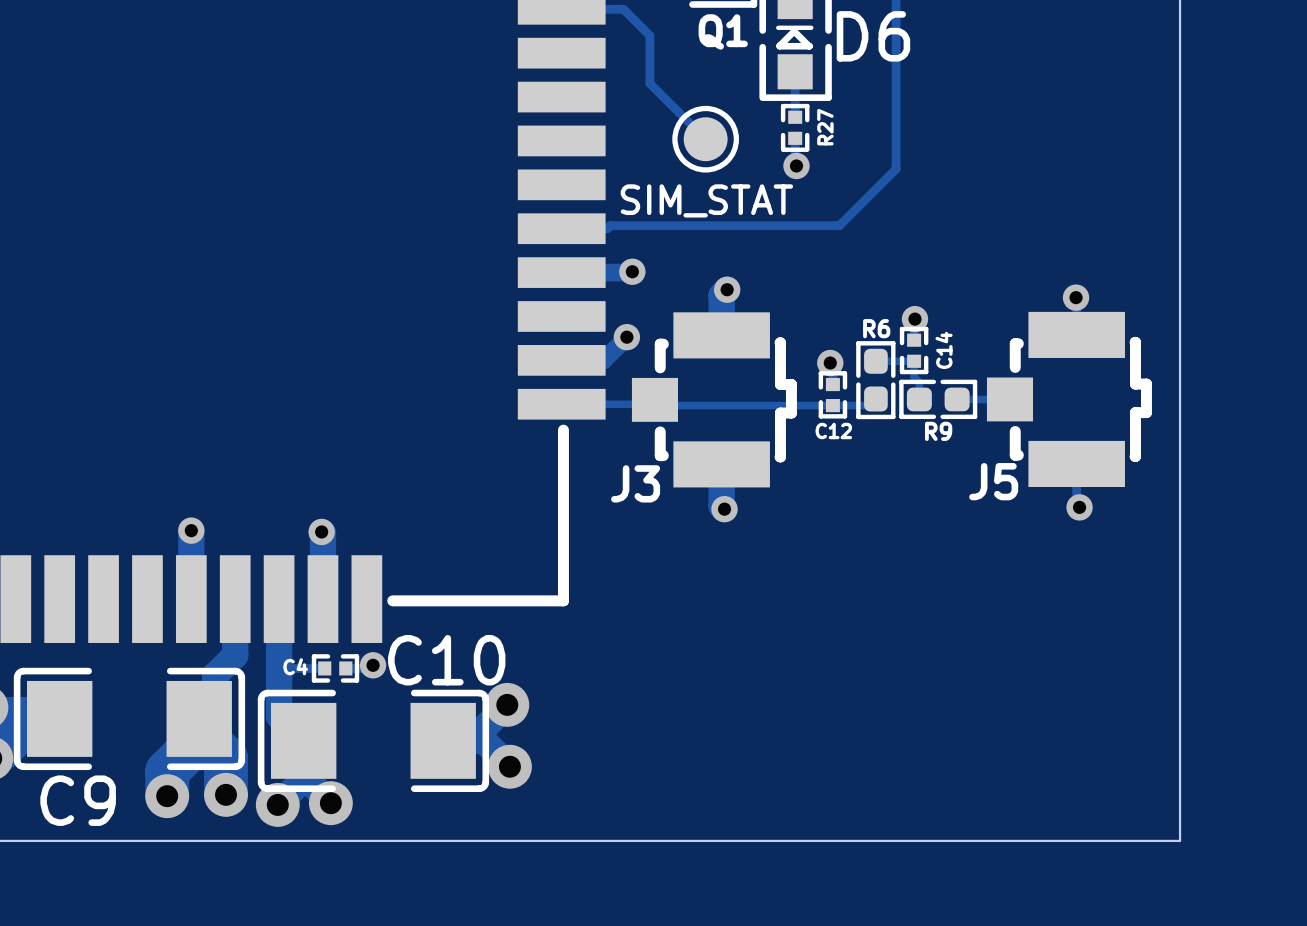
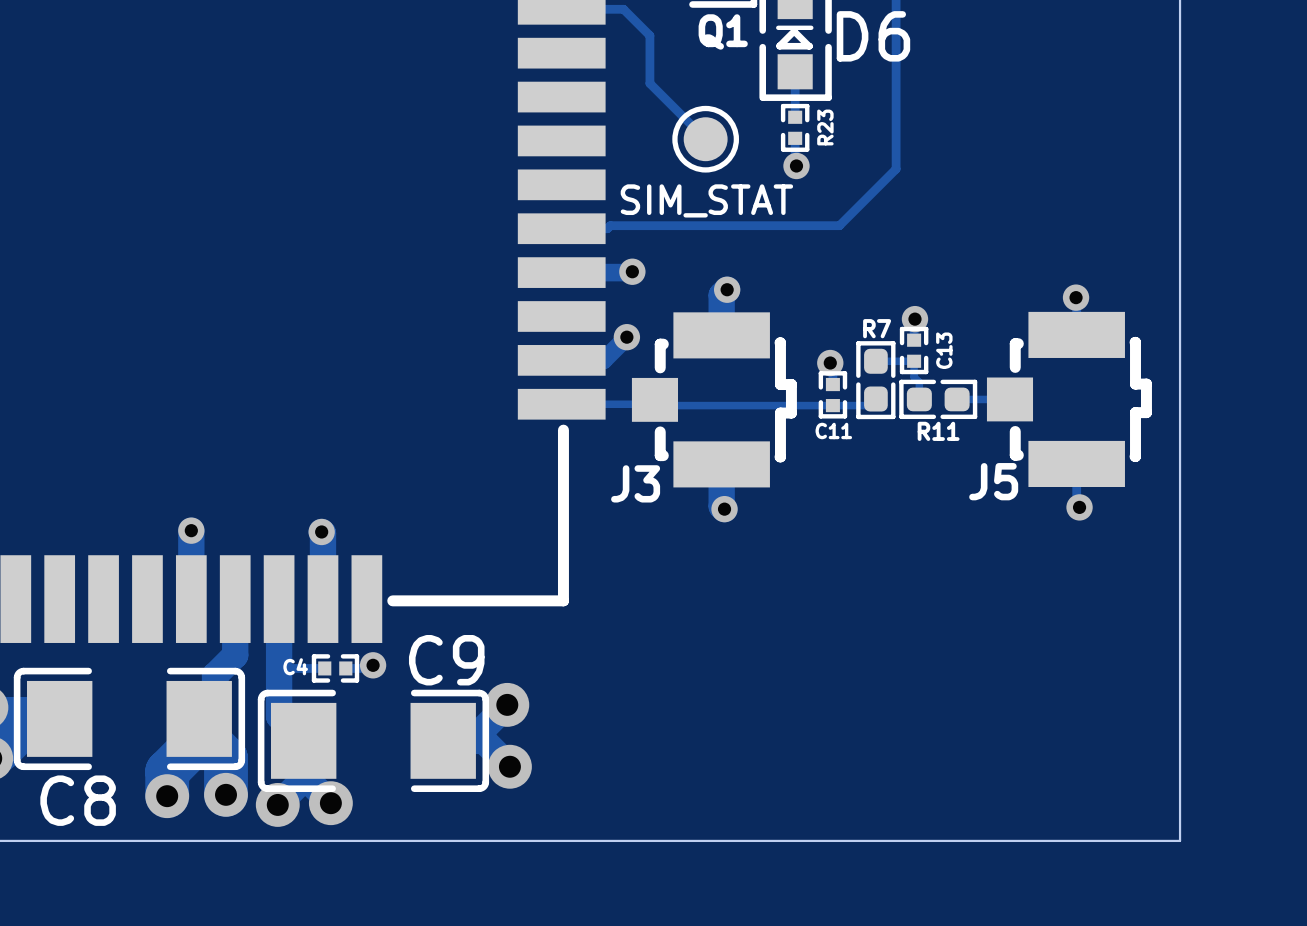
R27 name: R27 (825, 127) -> R23 (825, 127)
R6 name: R6 (876, 328) -> R7 (877, 328)
C14 name: C14 (944, 350) -> C13 (944, 350)
C12 name: C12 (833, 430) -> C11 (833, 430)
R9 name: R9 (938, 431) -> R11 (938, 431)
C10 name: C10 (446, 660) -> C9 (446, 660)
C9 name: C9 (78, 800) -> C8 (78, 800)

